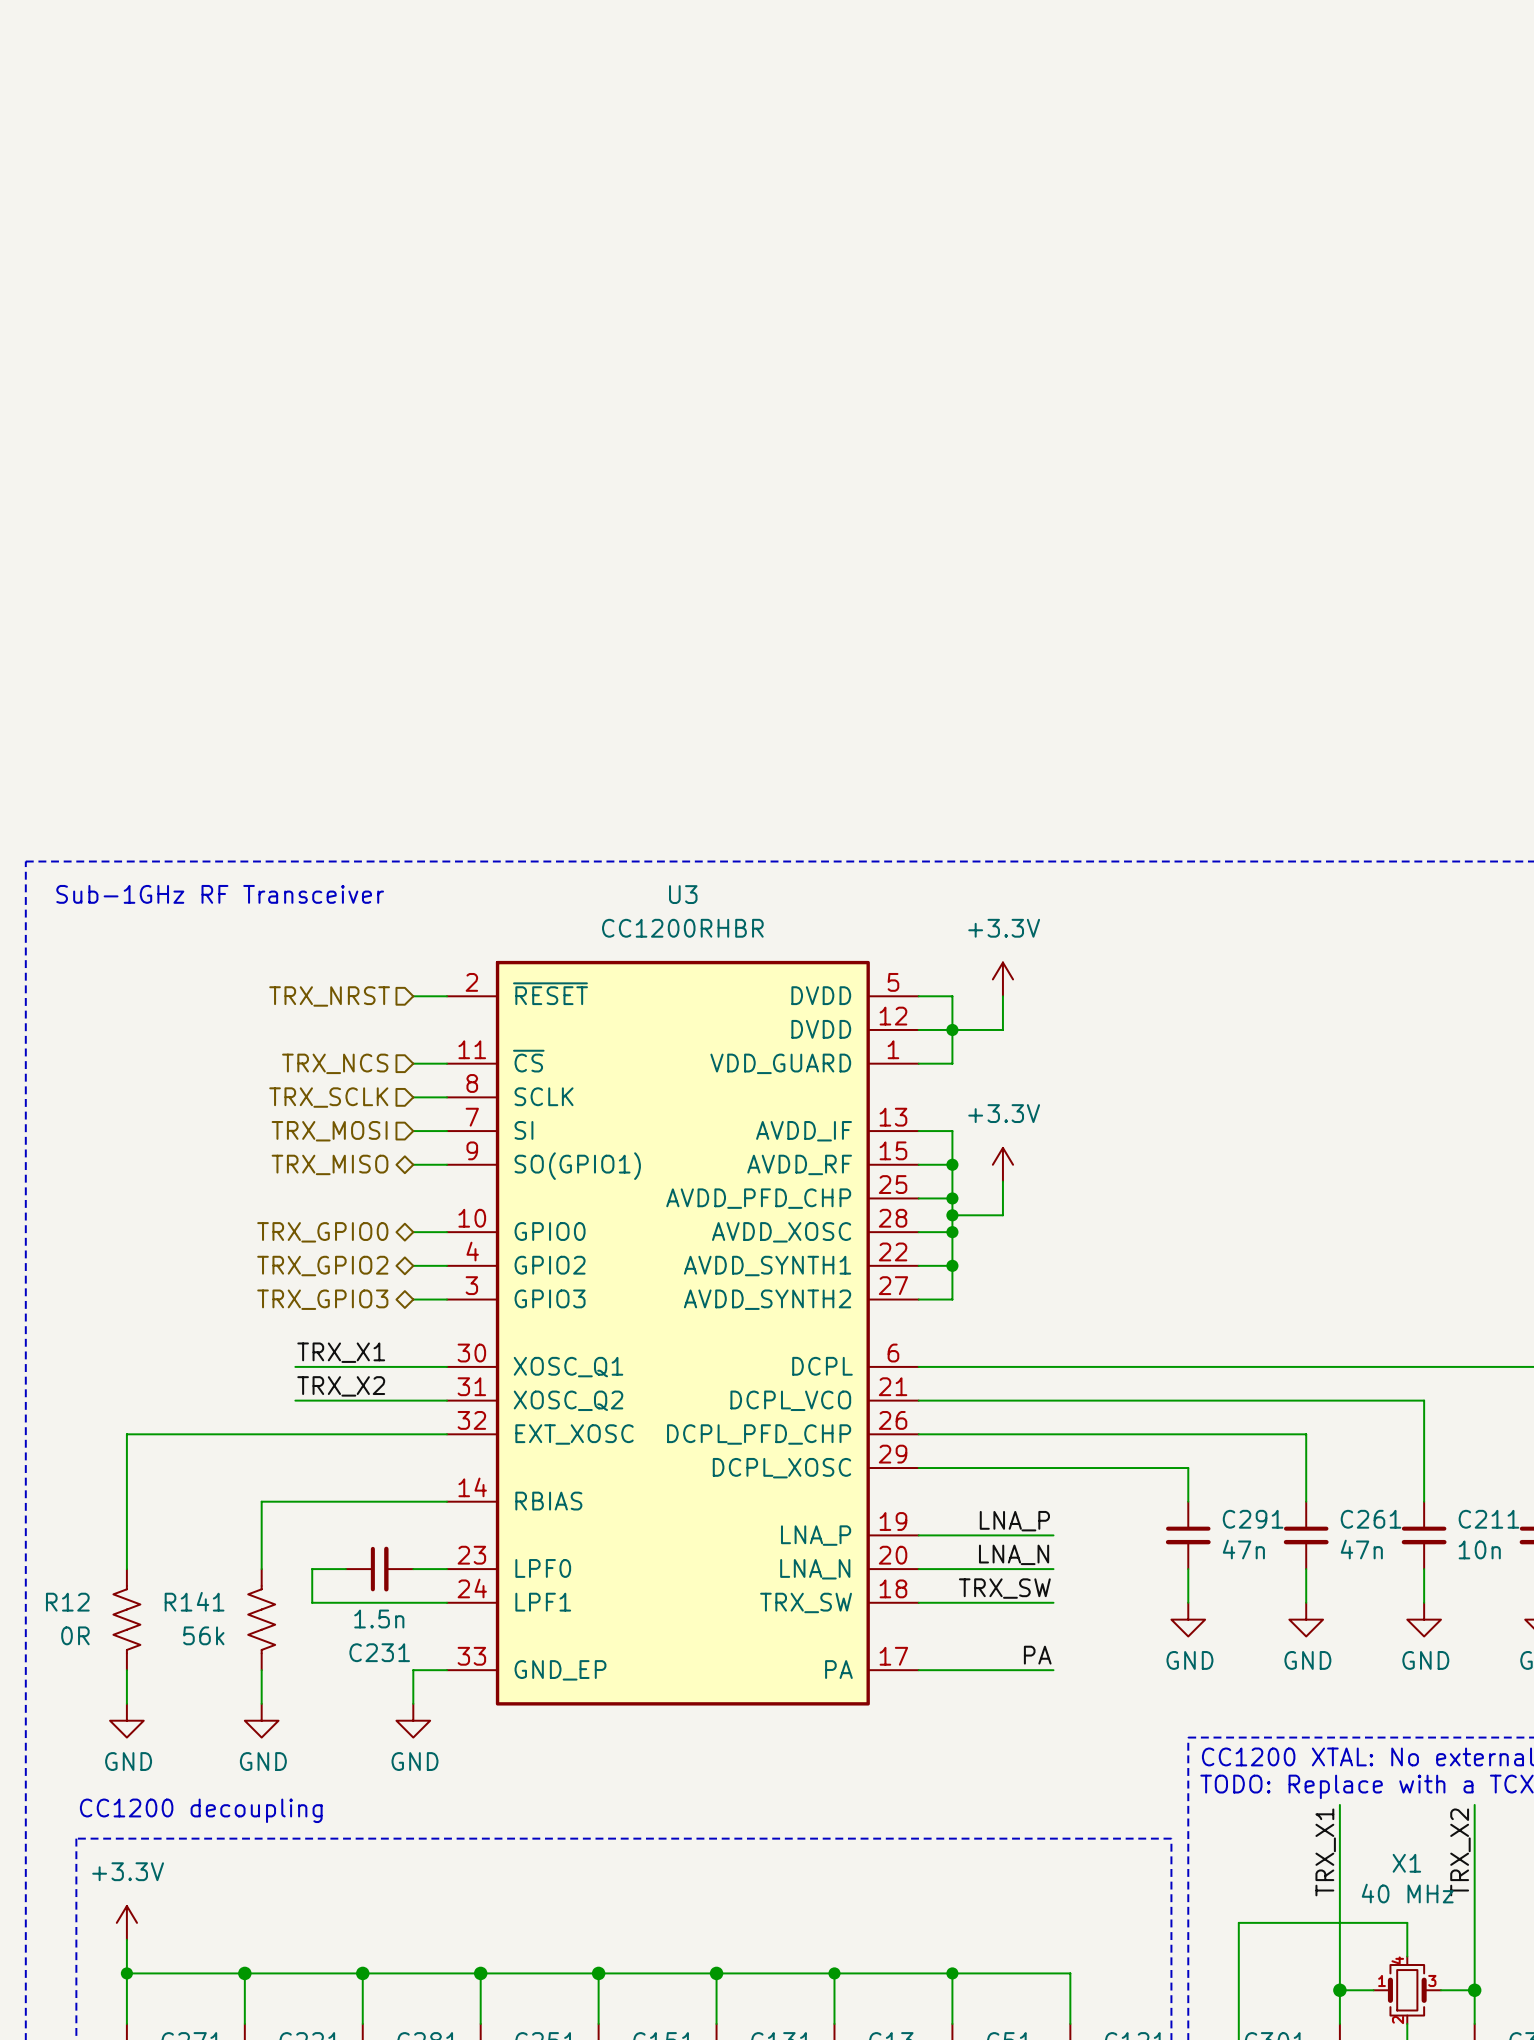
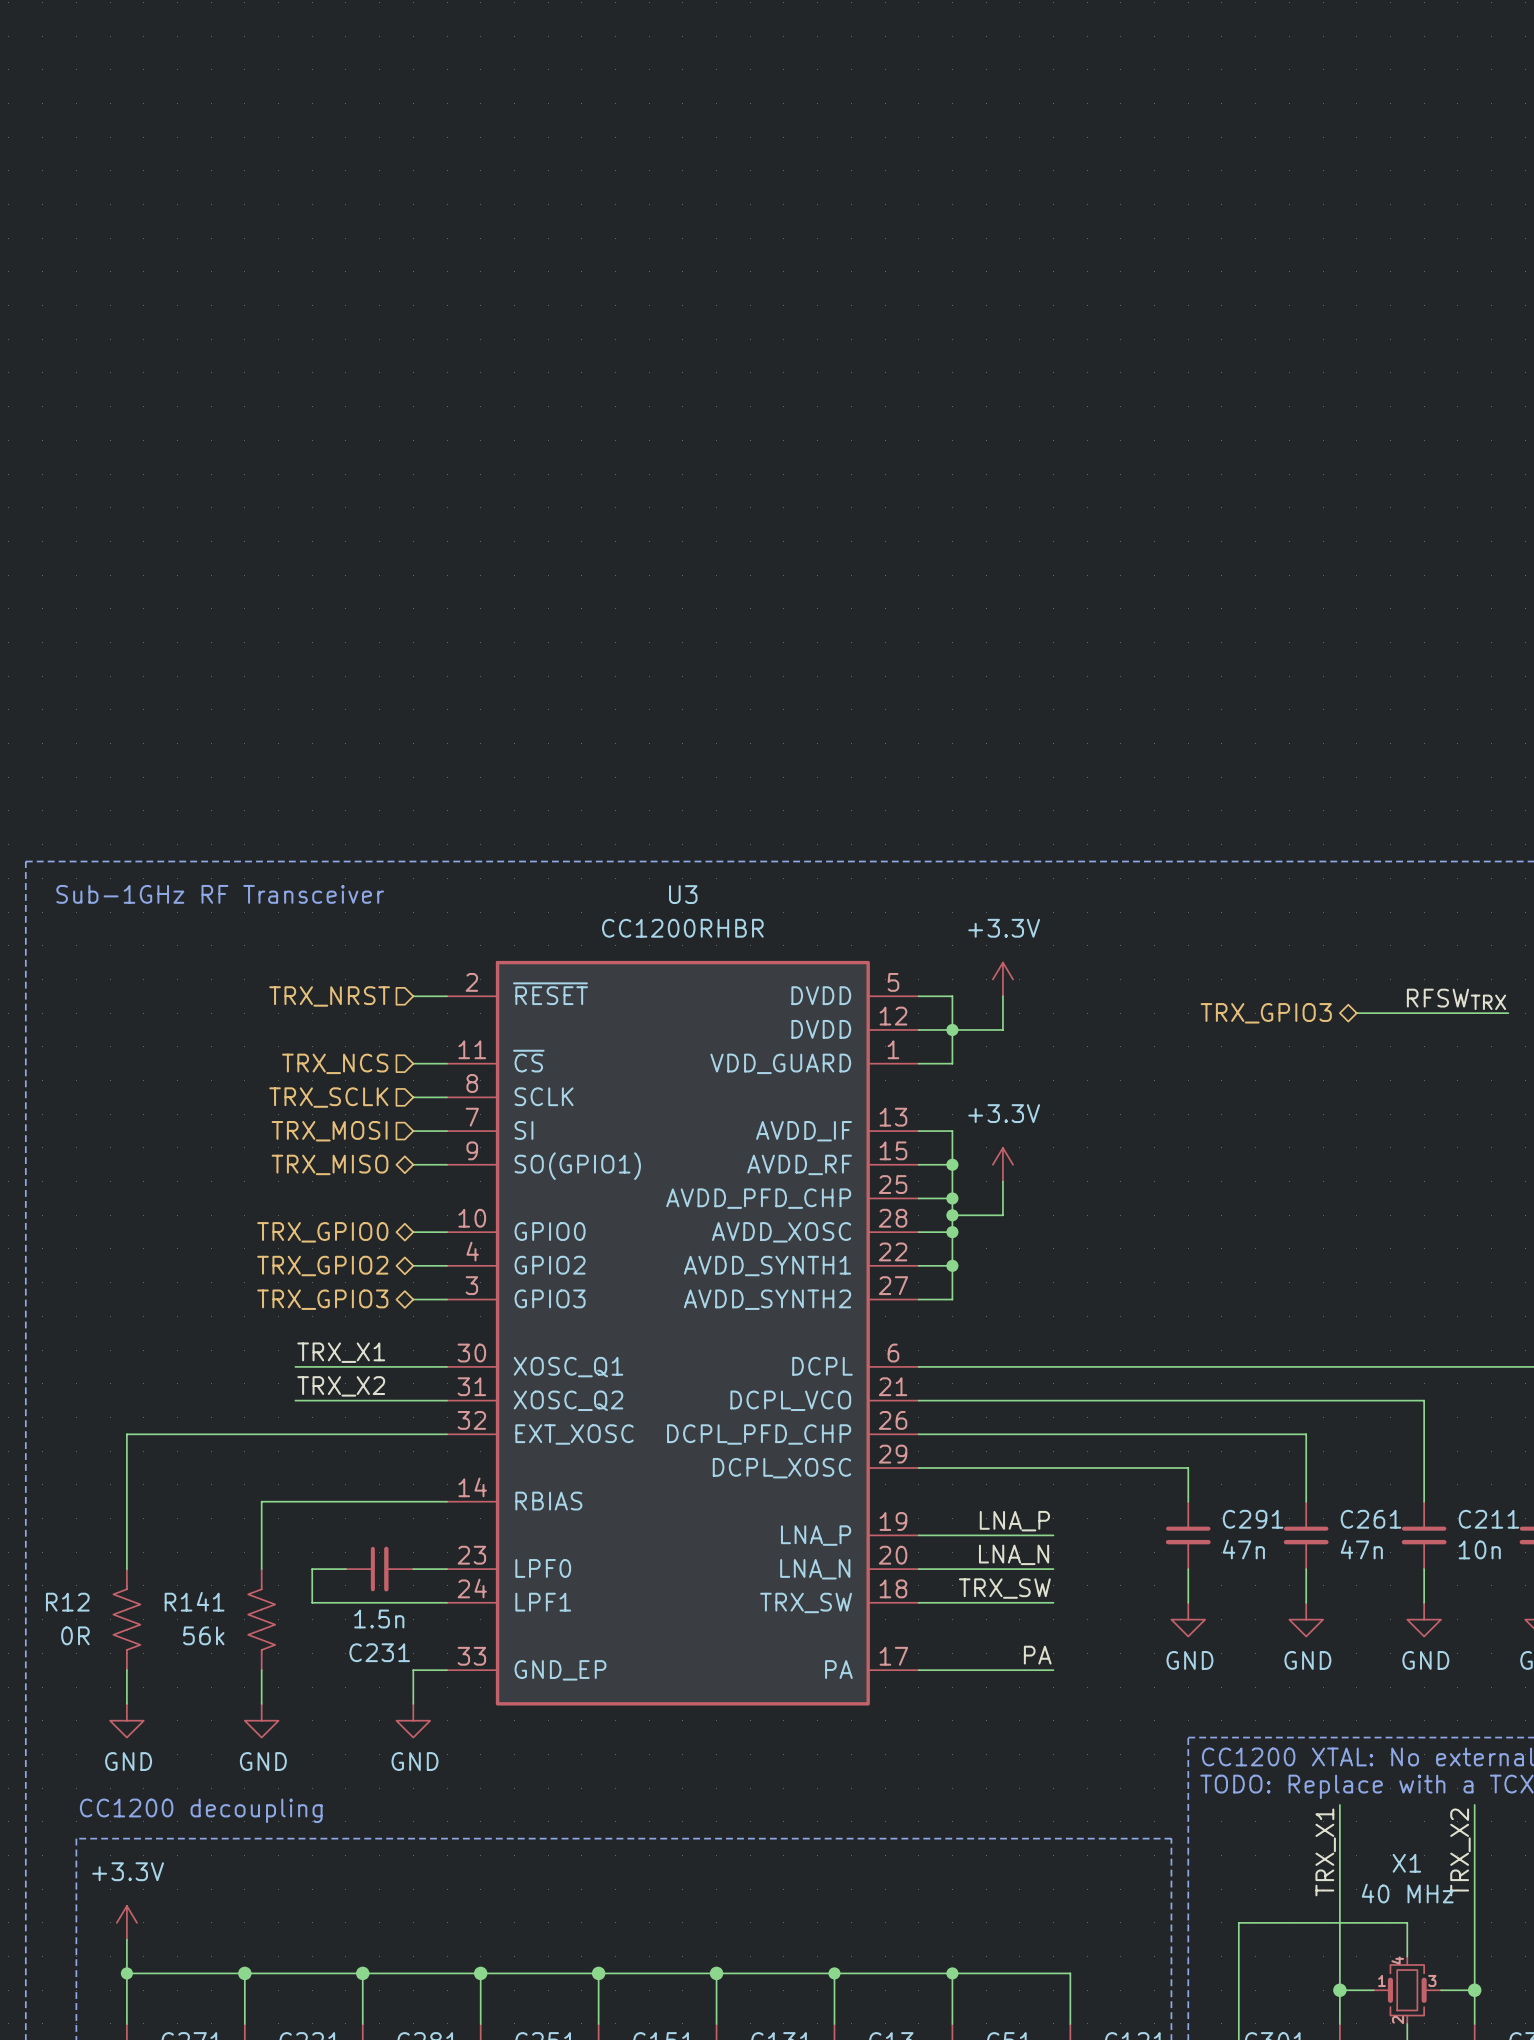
label: none -> RFSWTRX (1456, 999)
hierarchical label: none -> TRX_GPIO3 (1266, 1013)
wire: none -> (1356, 1013) (1508, 1013)

